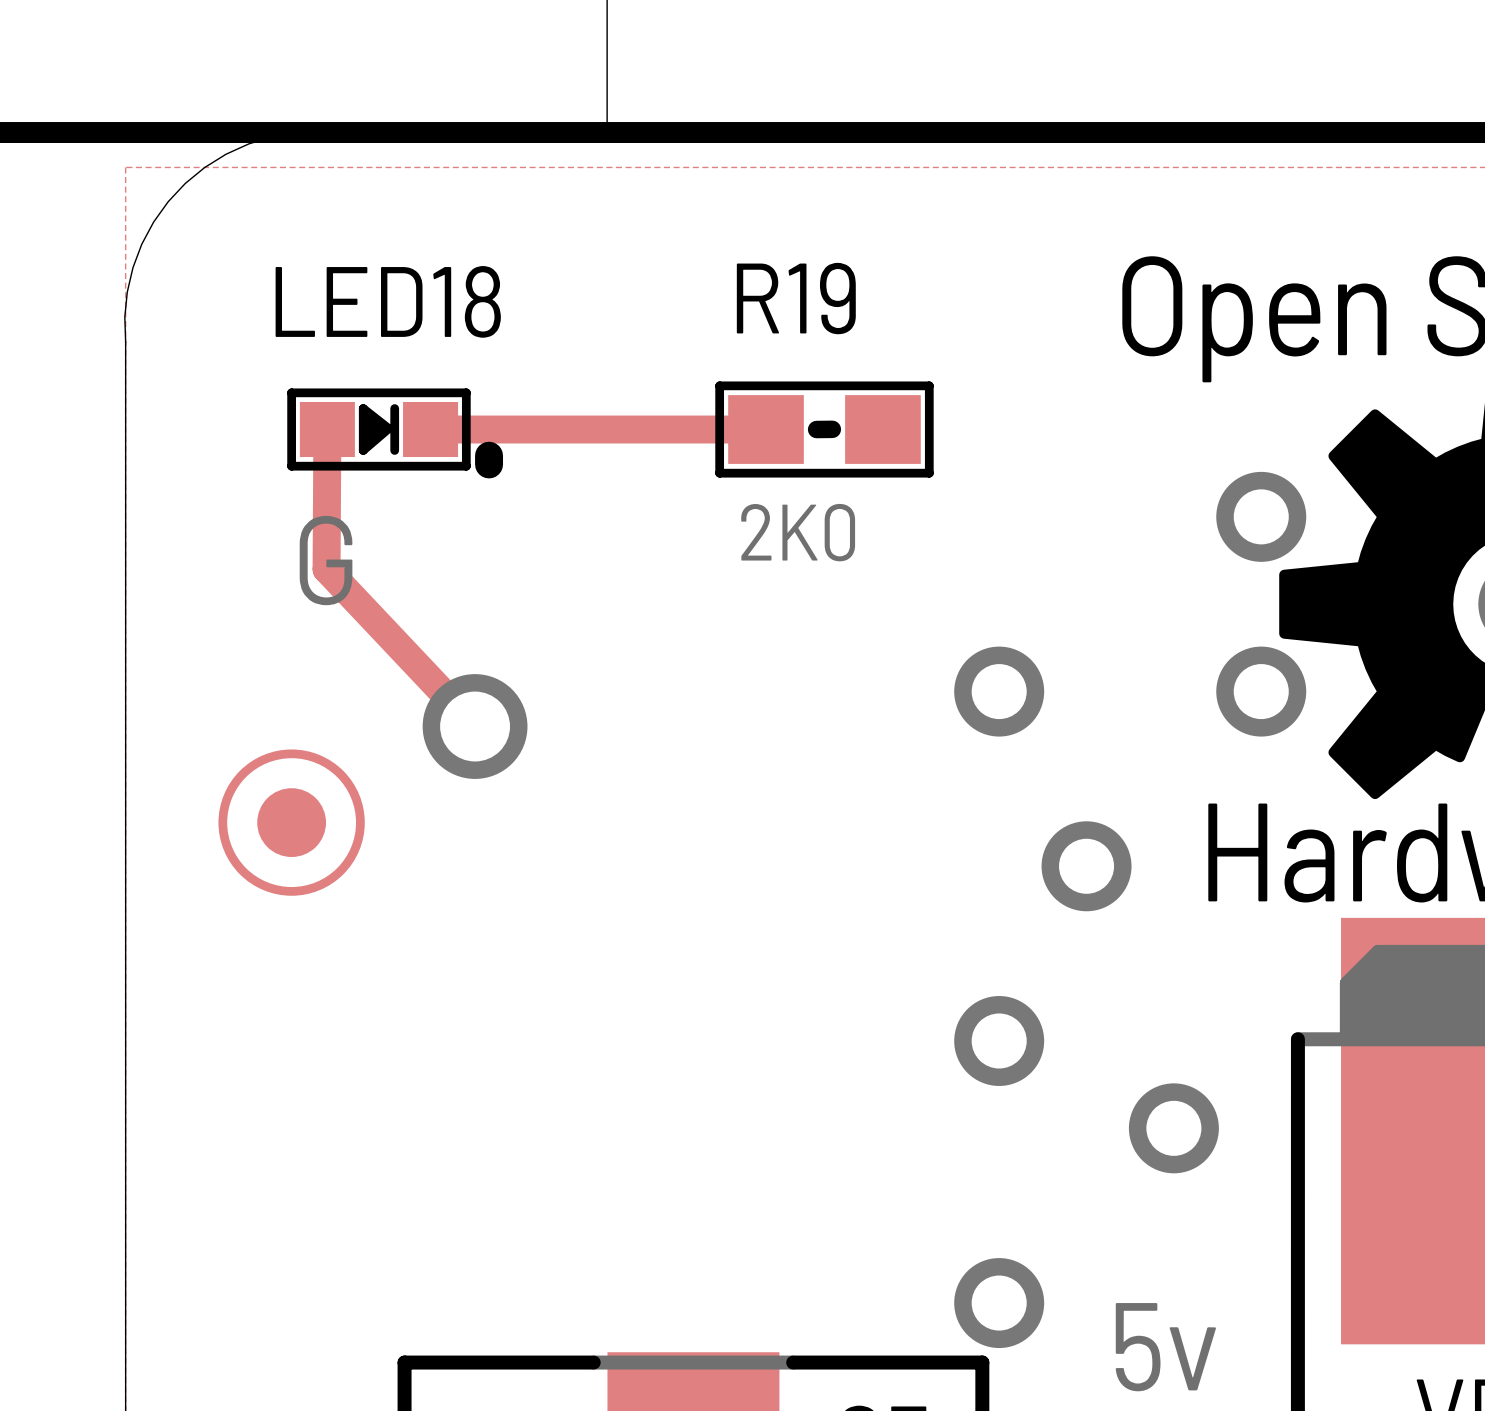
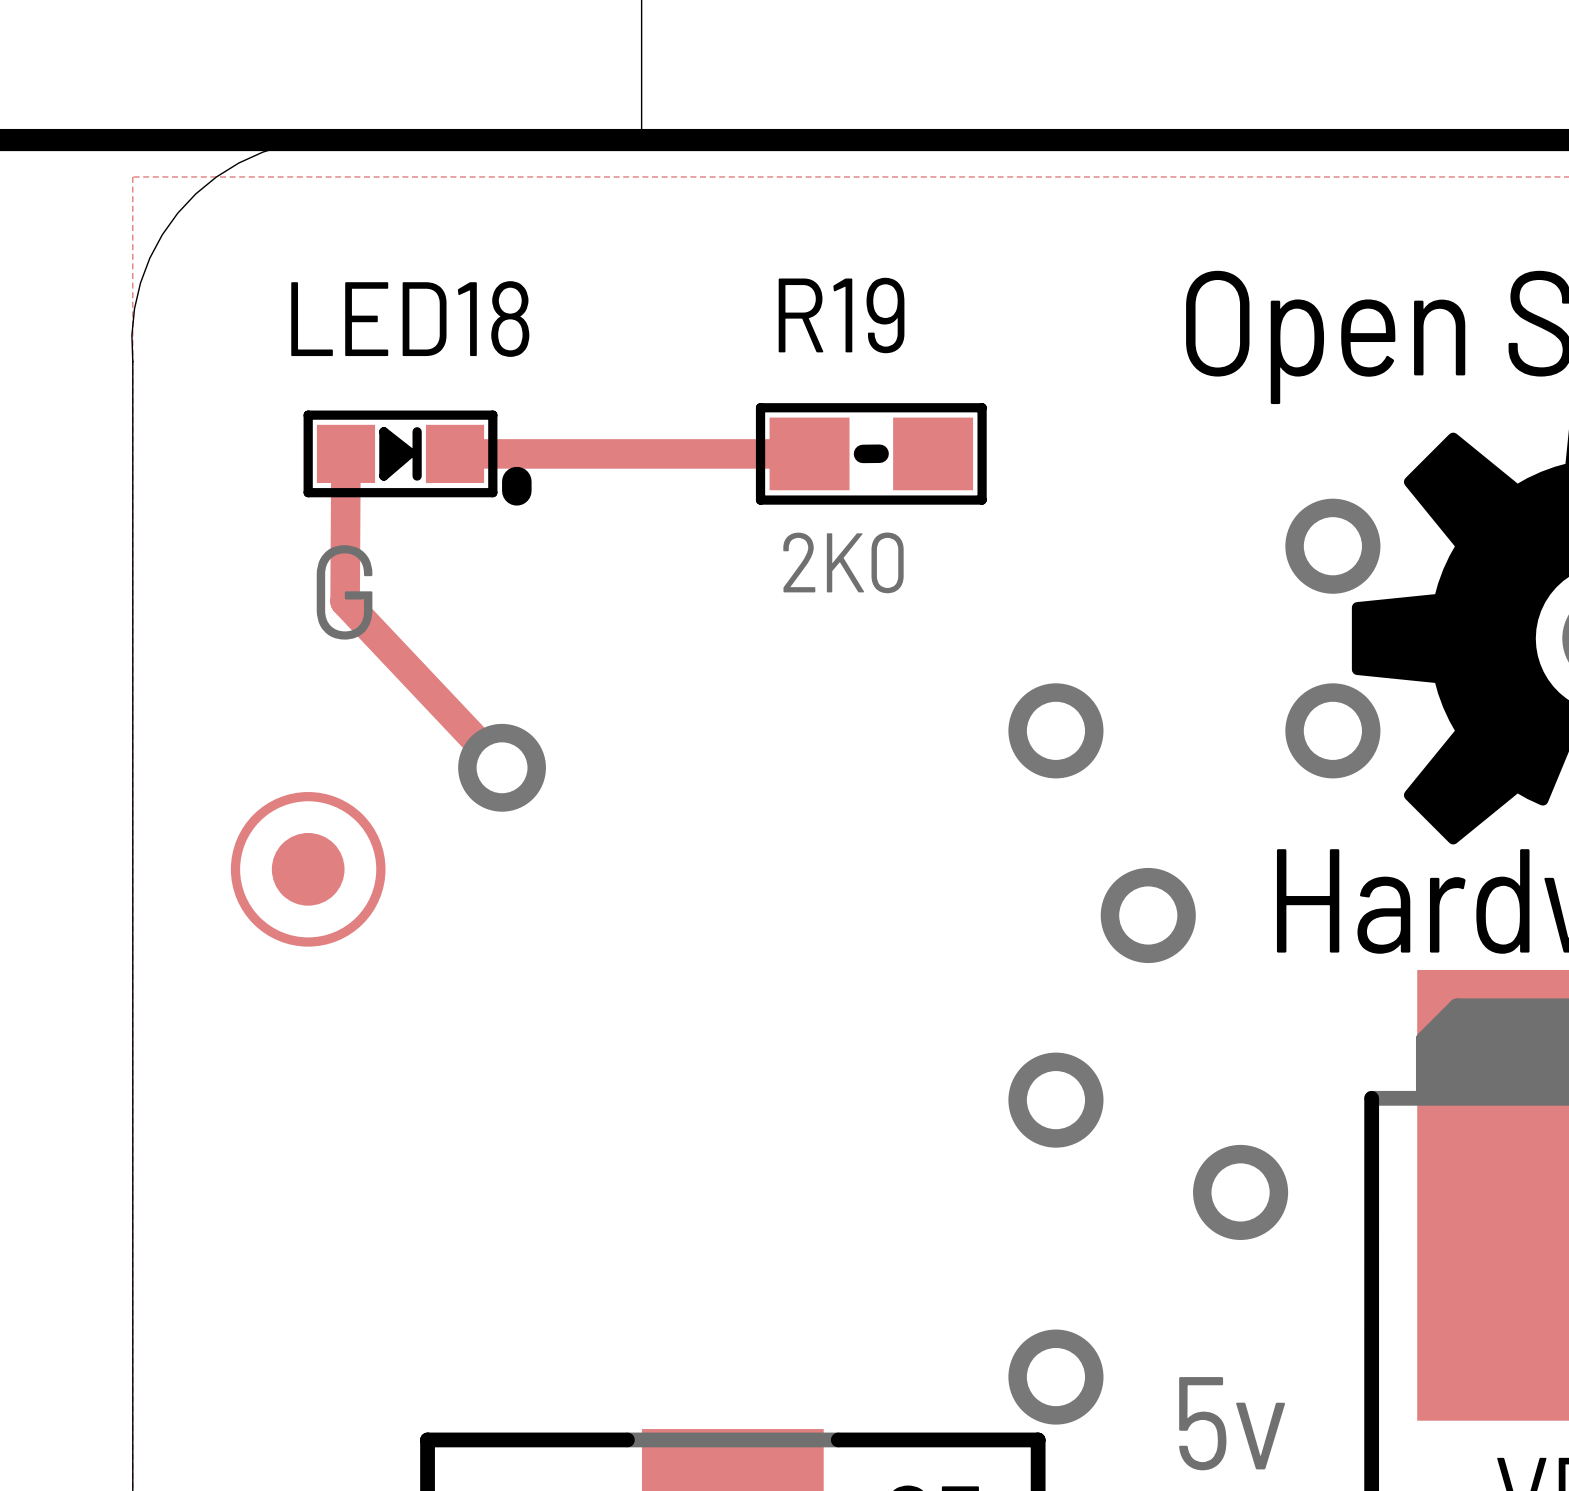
via size: [422, 674, 528, 779] -> [458, 723, 546, 812]

